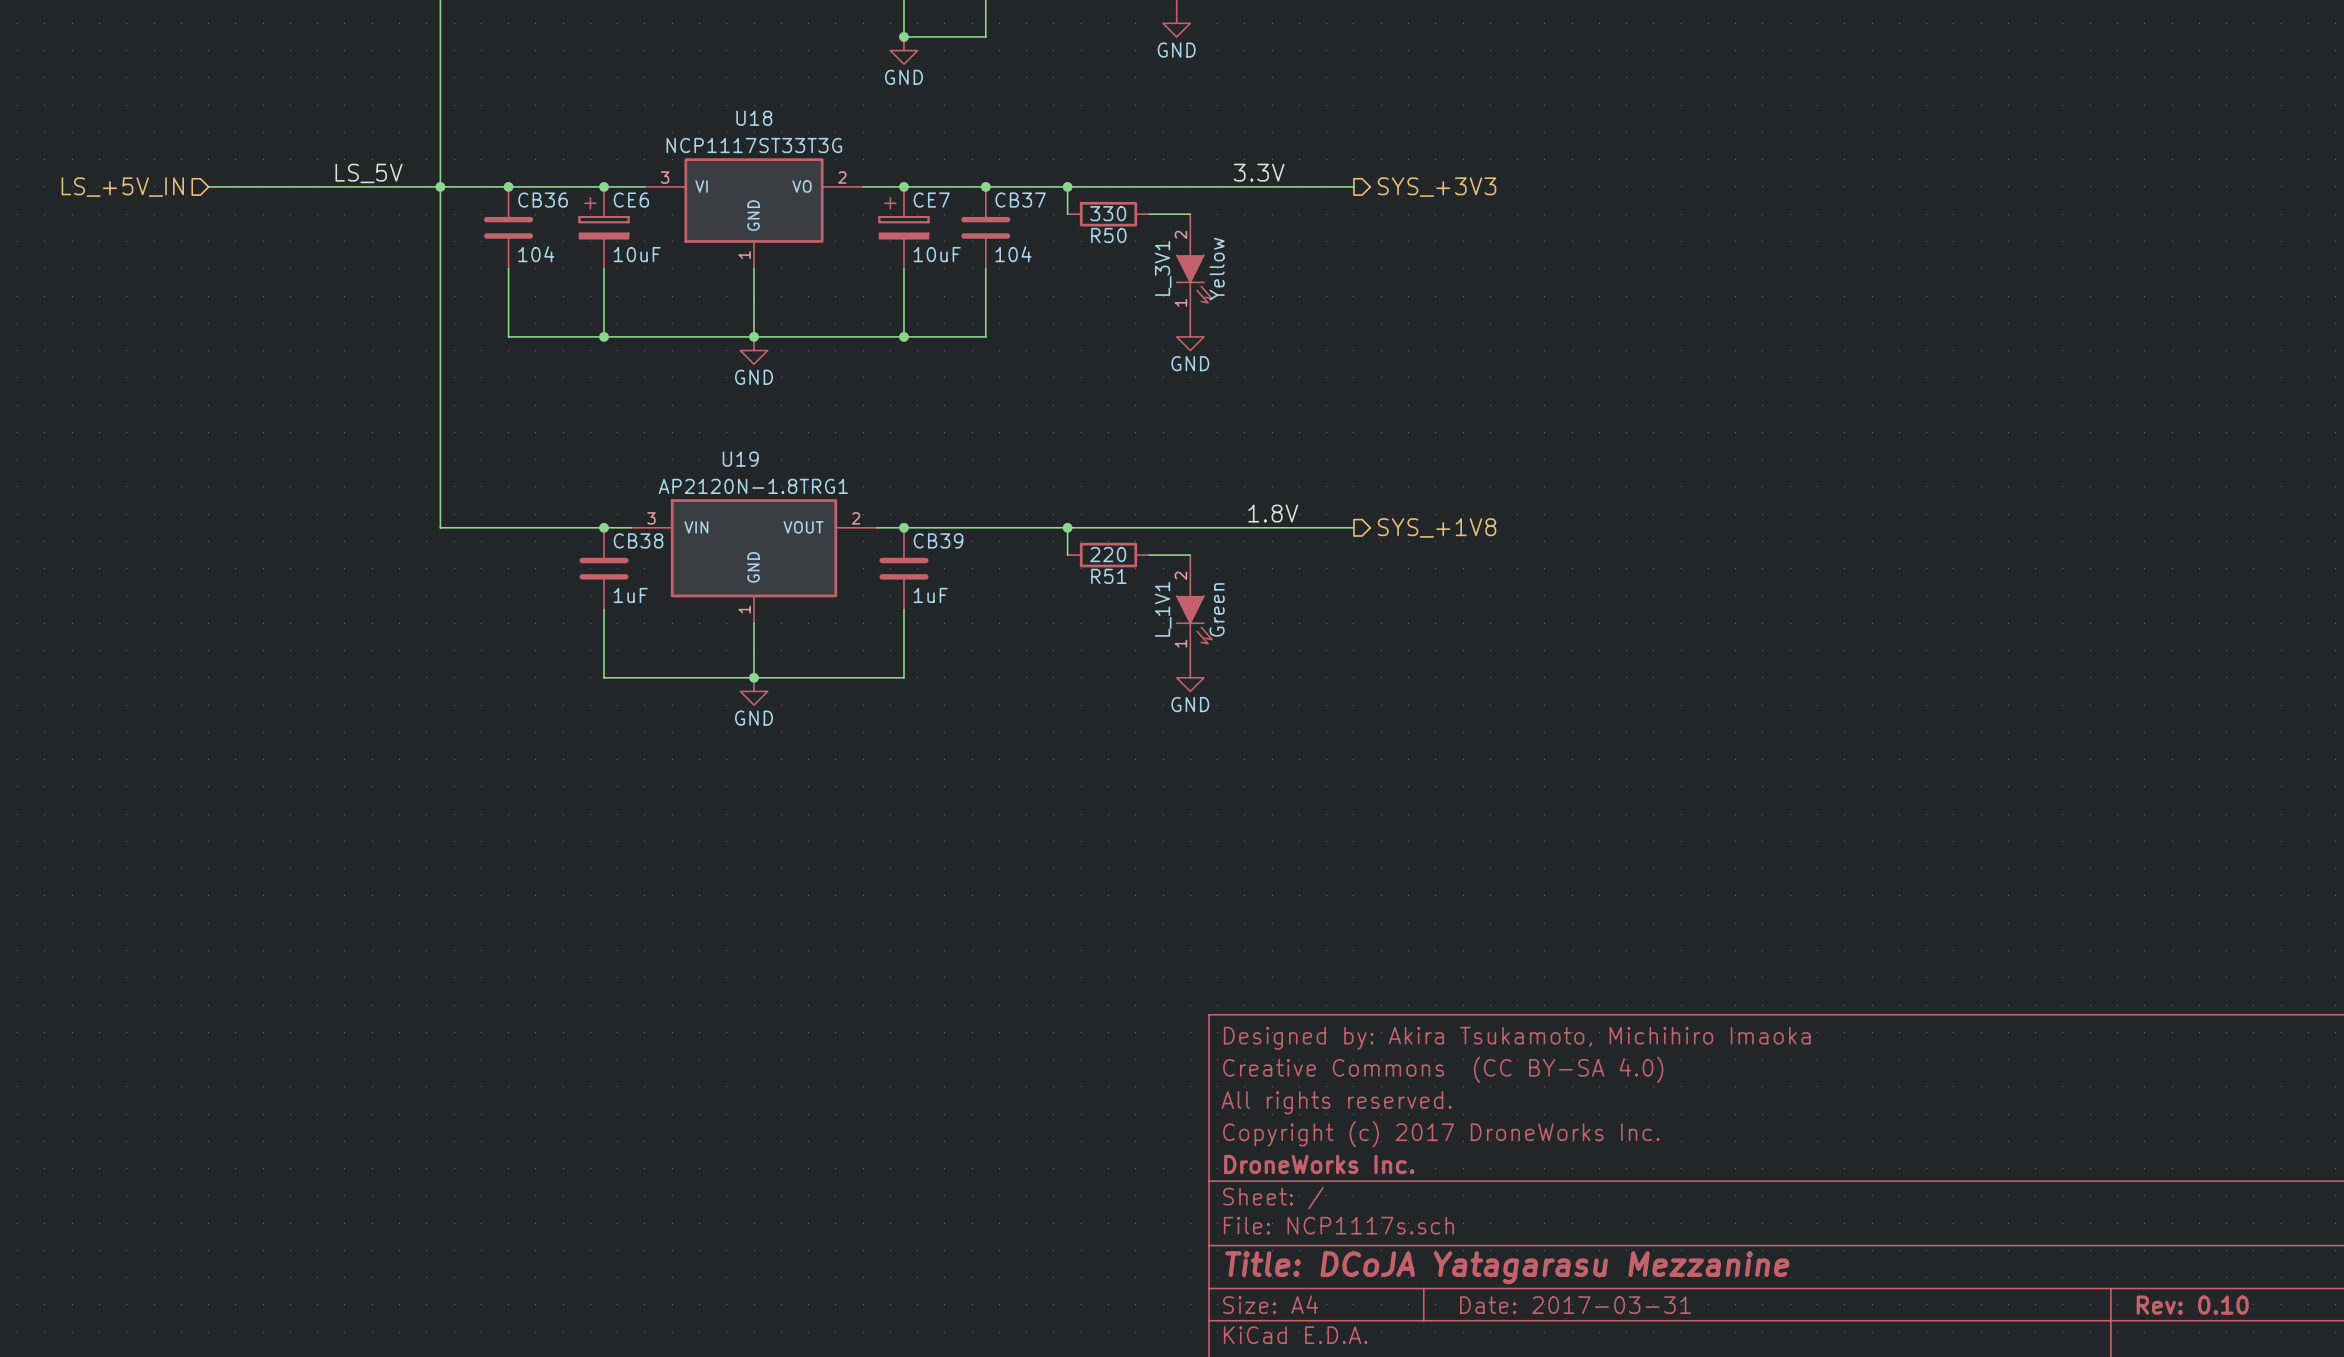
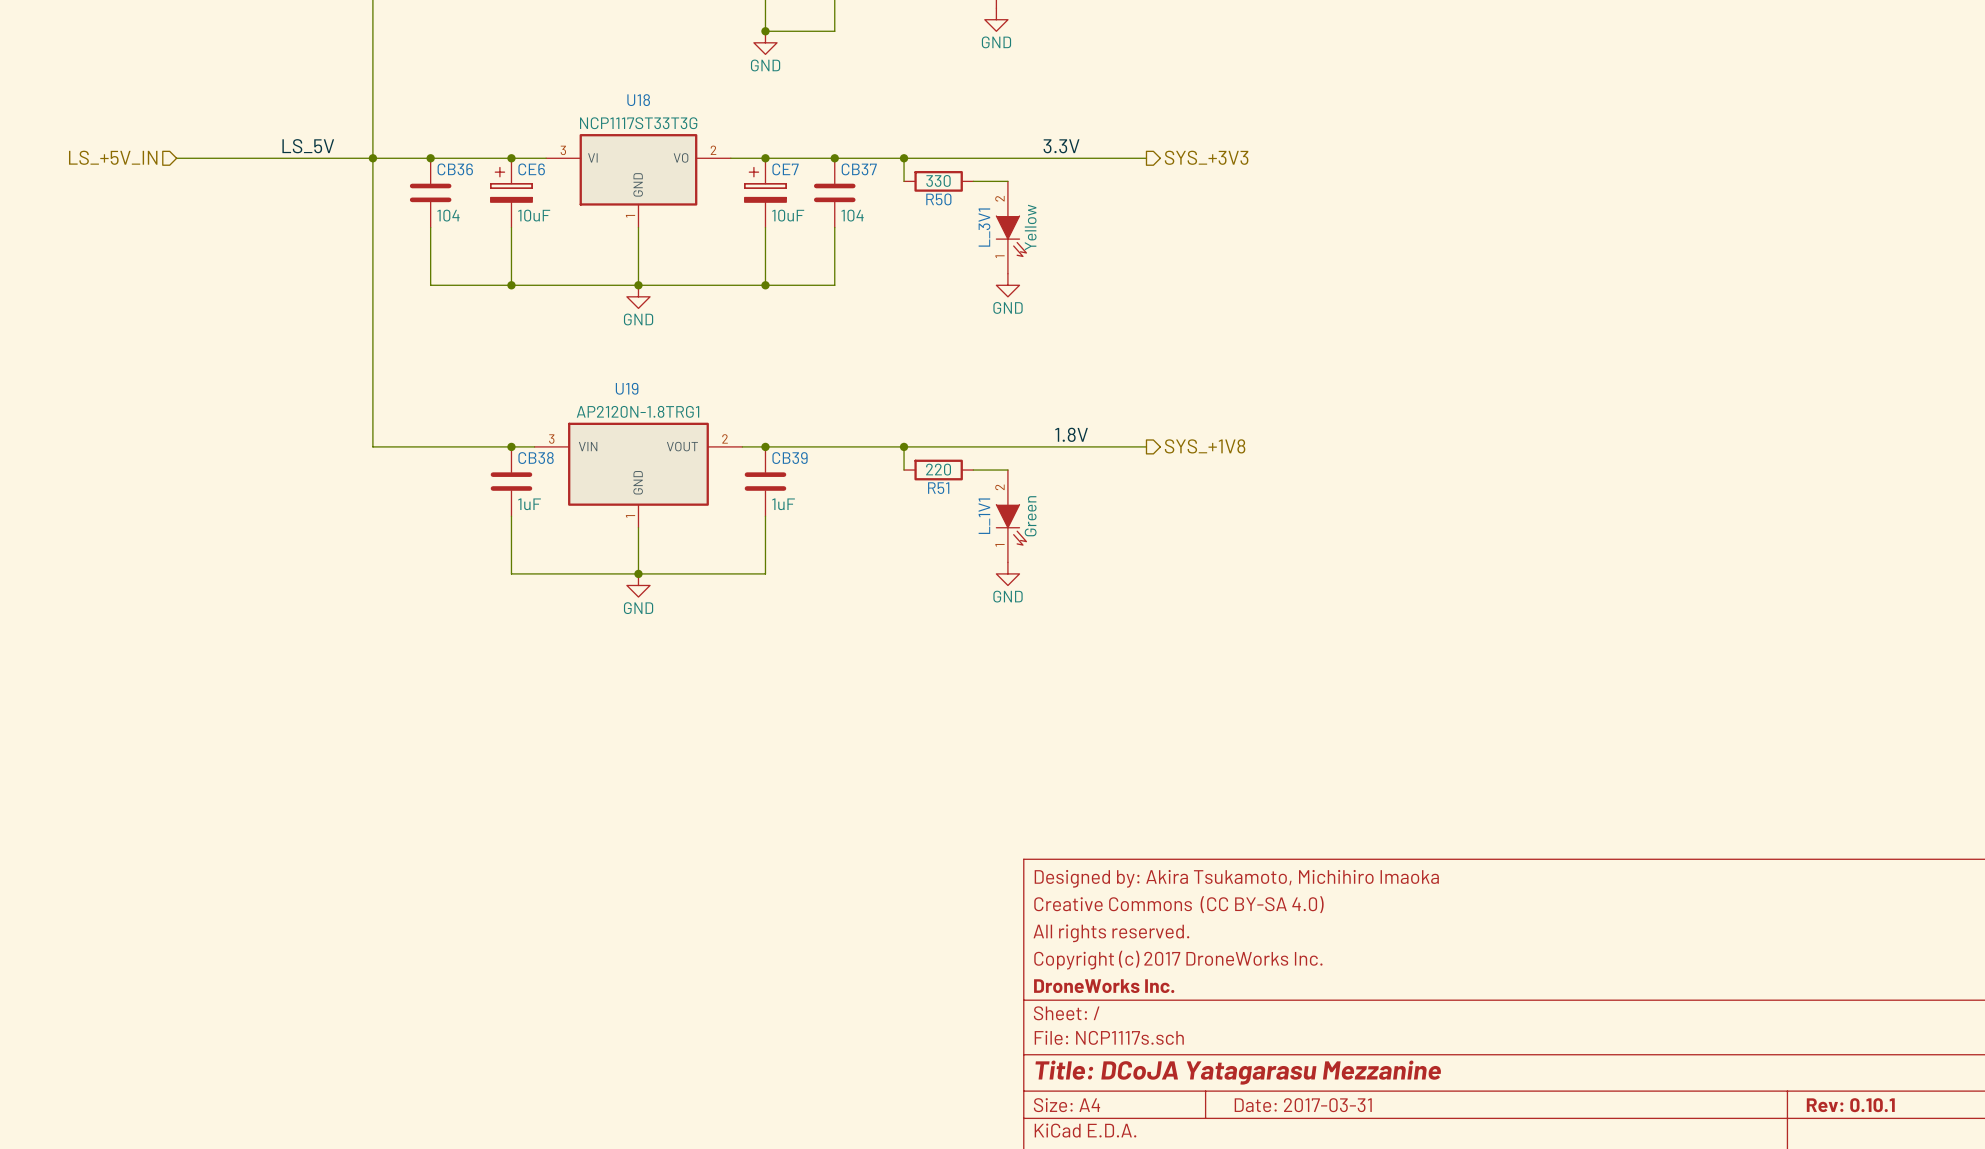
title block: Rev: 0.10 (2192, 1305) -> Rev: 0.10.1 (1850, 1105)

